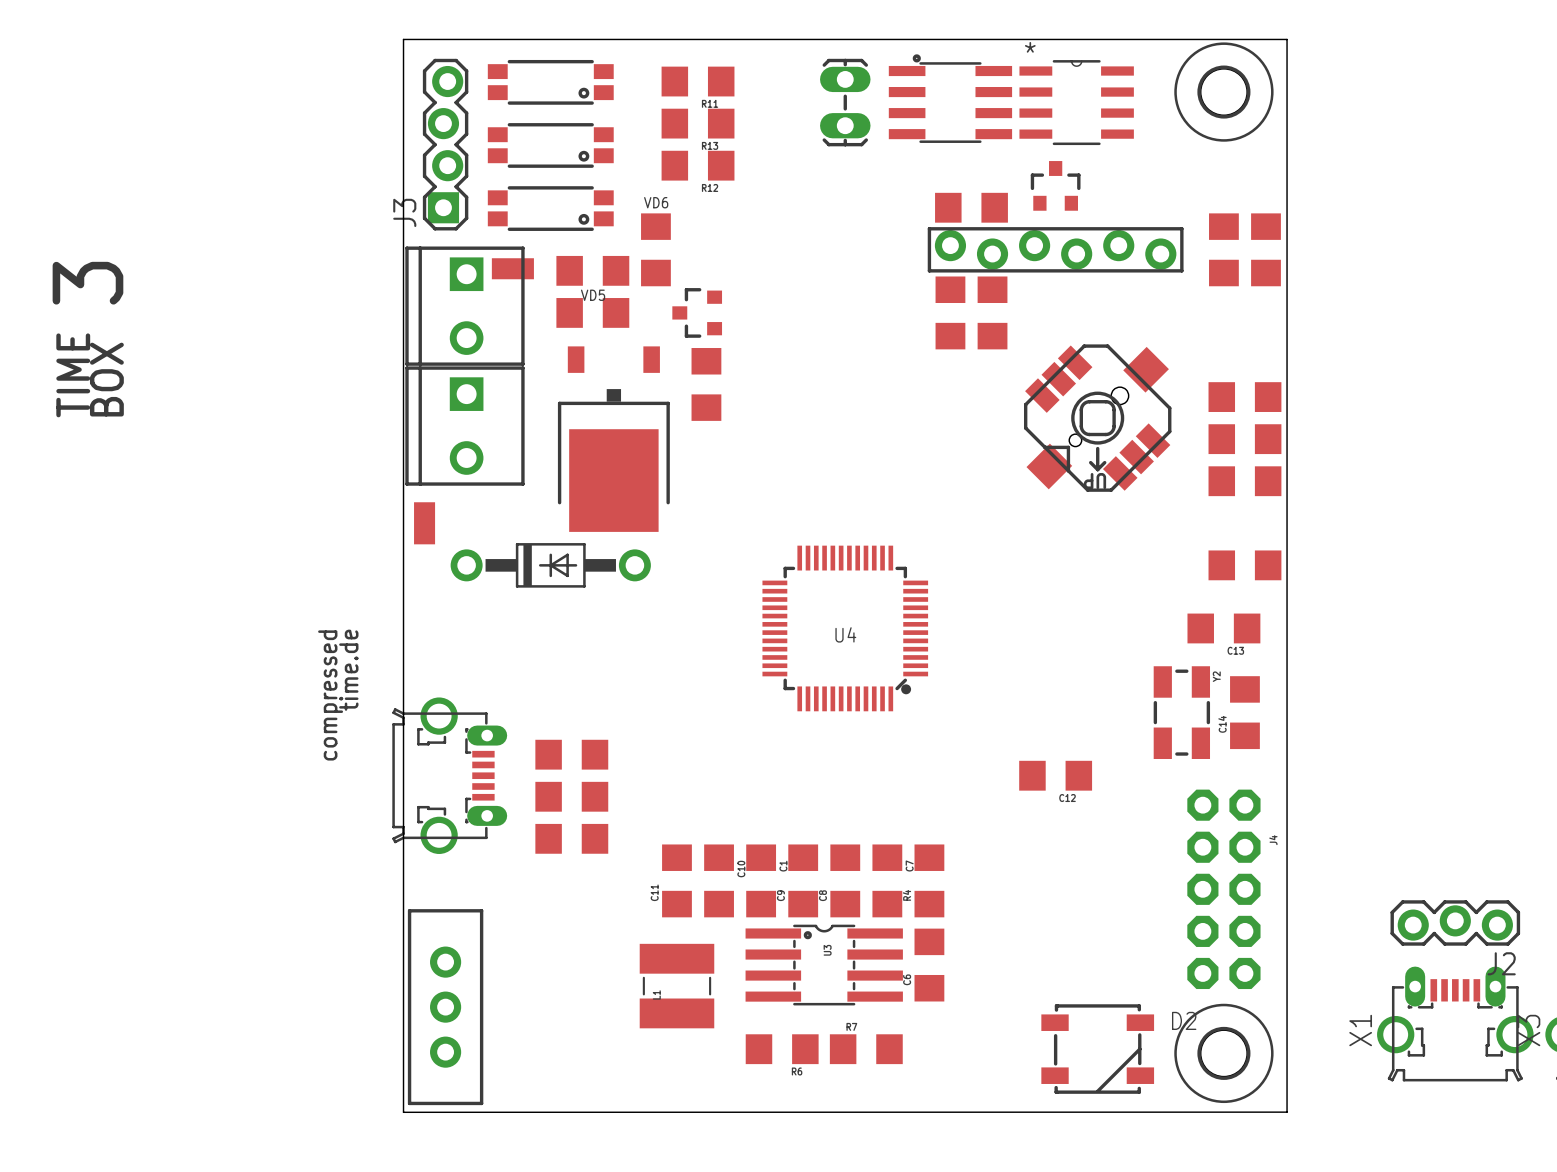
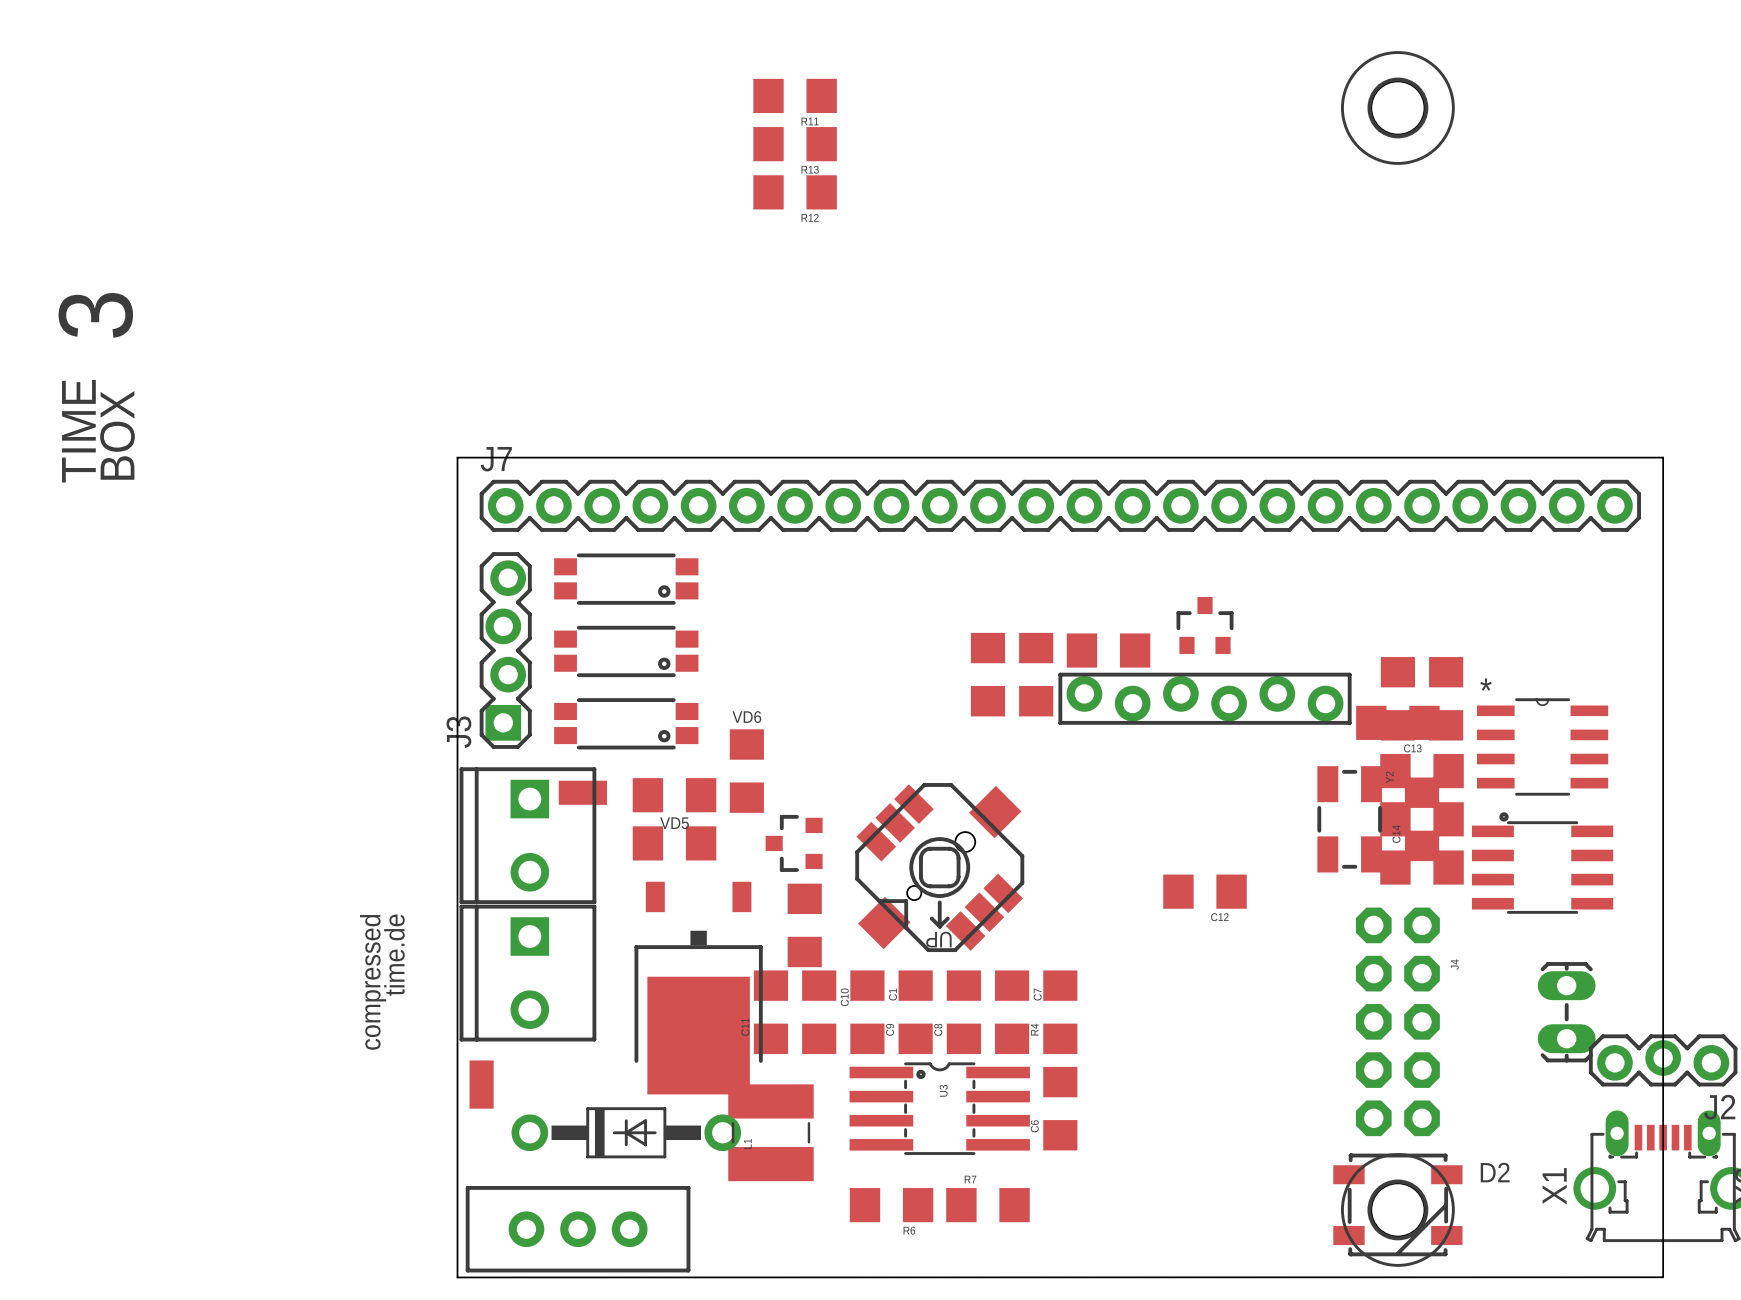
part: (550, 82) -> none
part: (950, 98) -> none
part: (845, 102) -> none
part: (1076, 102) -> none
J3 position: (445, 144) -> (505, 650)
part: (550, 145) -> none
part: (1055, 185) -> none
part: (971, 207) -> none
part: (550, 208) -> none
VD6 position: (655, 249) -> (746, 771)
part position: (1055, 249) -> (1205, 698)
part: (1223, 249) -> none
part: (1265, 249) -> none
part: (512, 268) -> none
VD5 position: (592, 270) -> (674, 795)
part: (464, 306) -> none
part: (592, 312) -> none
part: (697, 312) -> none
part: (950, 312) -> none
part: (992, 312) -> none
part: (706, 384) -> none
board edge: (403, 397) (403, 39) (1287, 39) (1287, 1112) -> (457, 457) (1663, 457) (1663, 1277) (1470, 1277)
part: (1244, 397) -> none
part: (1097, 418) -> none
part: (464, 426) -> none
part: (613, 439) -> none
J7: none -> (1060, 505)
part: (1244, 439) -> none
part: (1244, 481) -> none
part: none -> (626, 579)
part rotation: 0° (424, 523) -> 90° clockwise (582, 792)
part position: (424, 523) -> (582, 792)
part footprint: [450, 543, 651, 588] -> [554, 625, 699, 678]
part: none -> (1205, 625)
part: none -> (1108, 650)
part: (1244, 565) -> none
part: none -> (987, 674)
part: none -> (1036, 674)
part: none -> (1397, 698)
part: none -> (1446, 698)
U4: (845, 628) -> none
part: none -> (626, 723)
part: none -> (1542, 746)
text position: time.de (348, 670) -> time.de (394, 955)
part: none -> (1422, 771)
text position: compressed (330, 695) -> compressed (373, 982)
part: none -> (1422, 819)
part: none -> (527, 835)
part: none -> (794, 843)
part: none -> (1542, 863)
part position: (571, 754) -> (674, 843)
part: none -> (939, 867)
part: none -> (1422, 867)
part: (449, 775) -> none
part: (571, 796) -> none
part: none -> (804, 925)
part: (571, 838) -> none
part: none -> (527, 973)
part: none -> (698, 988)
part: none -> (1566, 1012)
part: none -> (481, 1084)
part: none -> (626, 1132)
part rotation: 0° (445, 1007) -> 90° clockwise (578, 1229)
D2 position: (1097, 1049) -> (1397, 1204)

